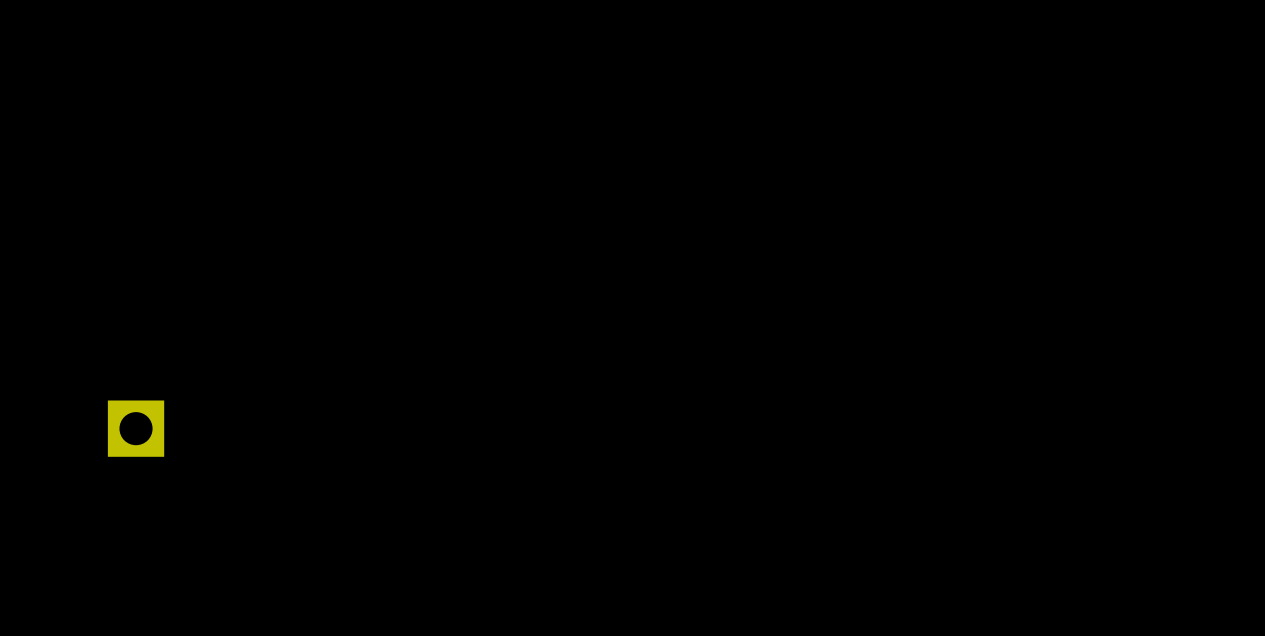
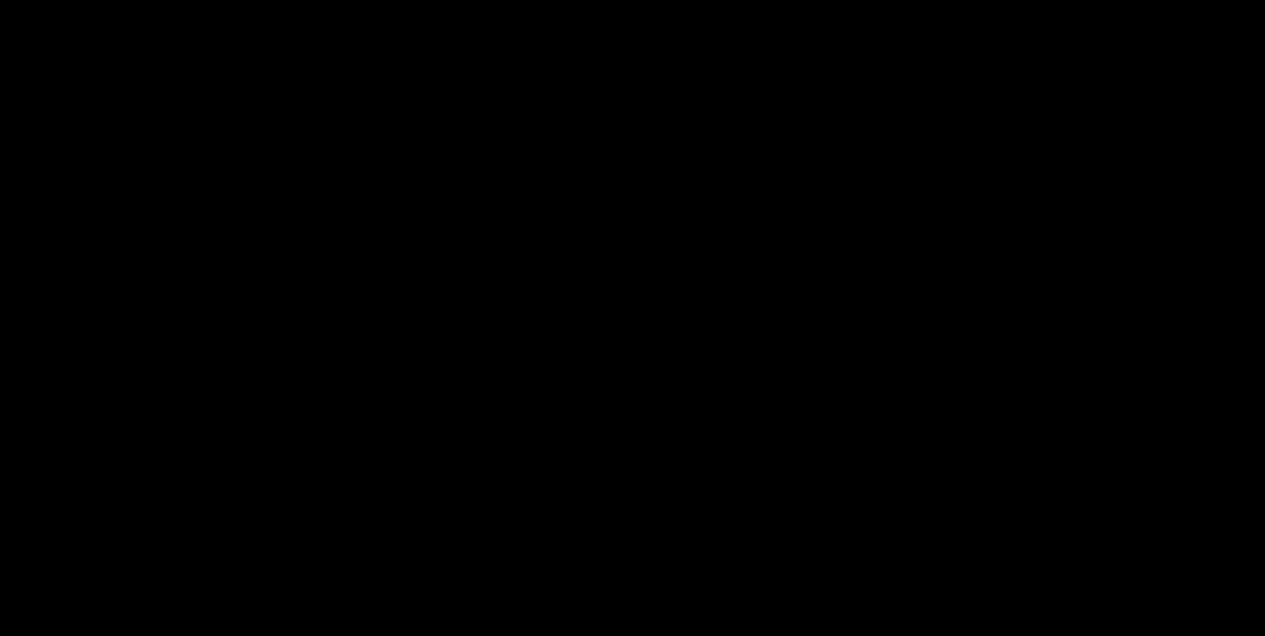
part: (136, 428) -> none

